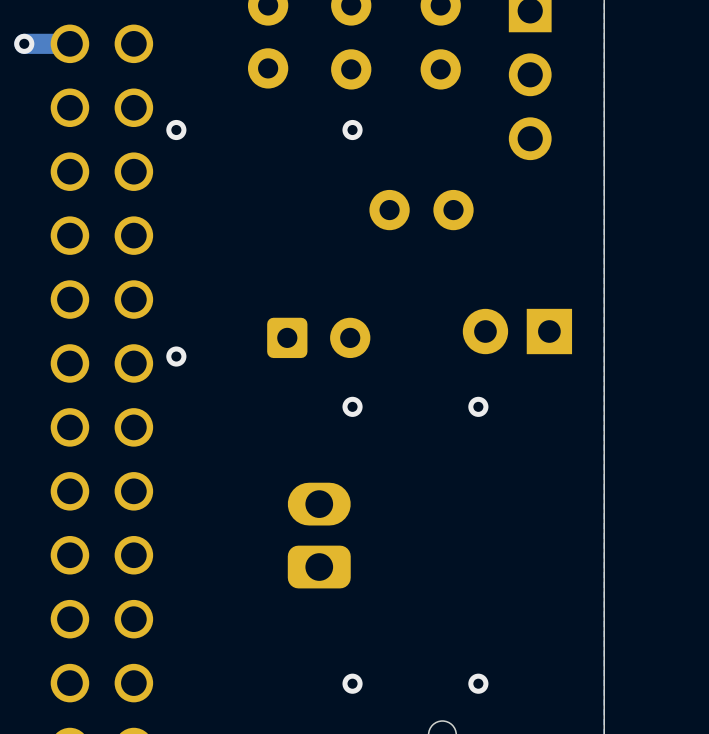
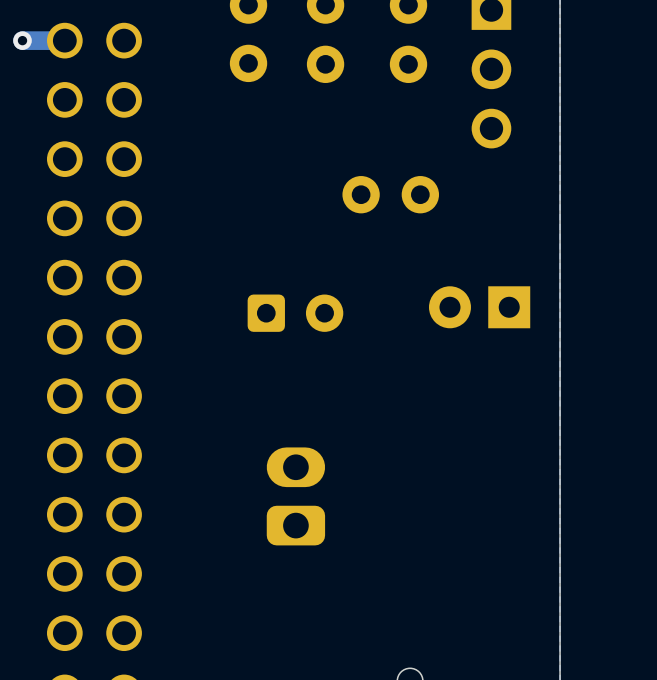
via: (176, 130) -> none
via: (352, 130) -> none
via: (176, 356) -> none
via: (352, 406) -> none
via: (478, 406) -> none
via: (352, 683) -> none
via: (478, 683) -> none

